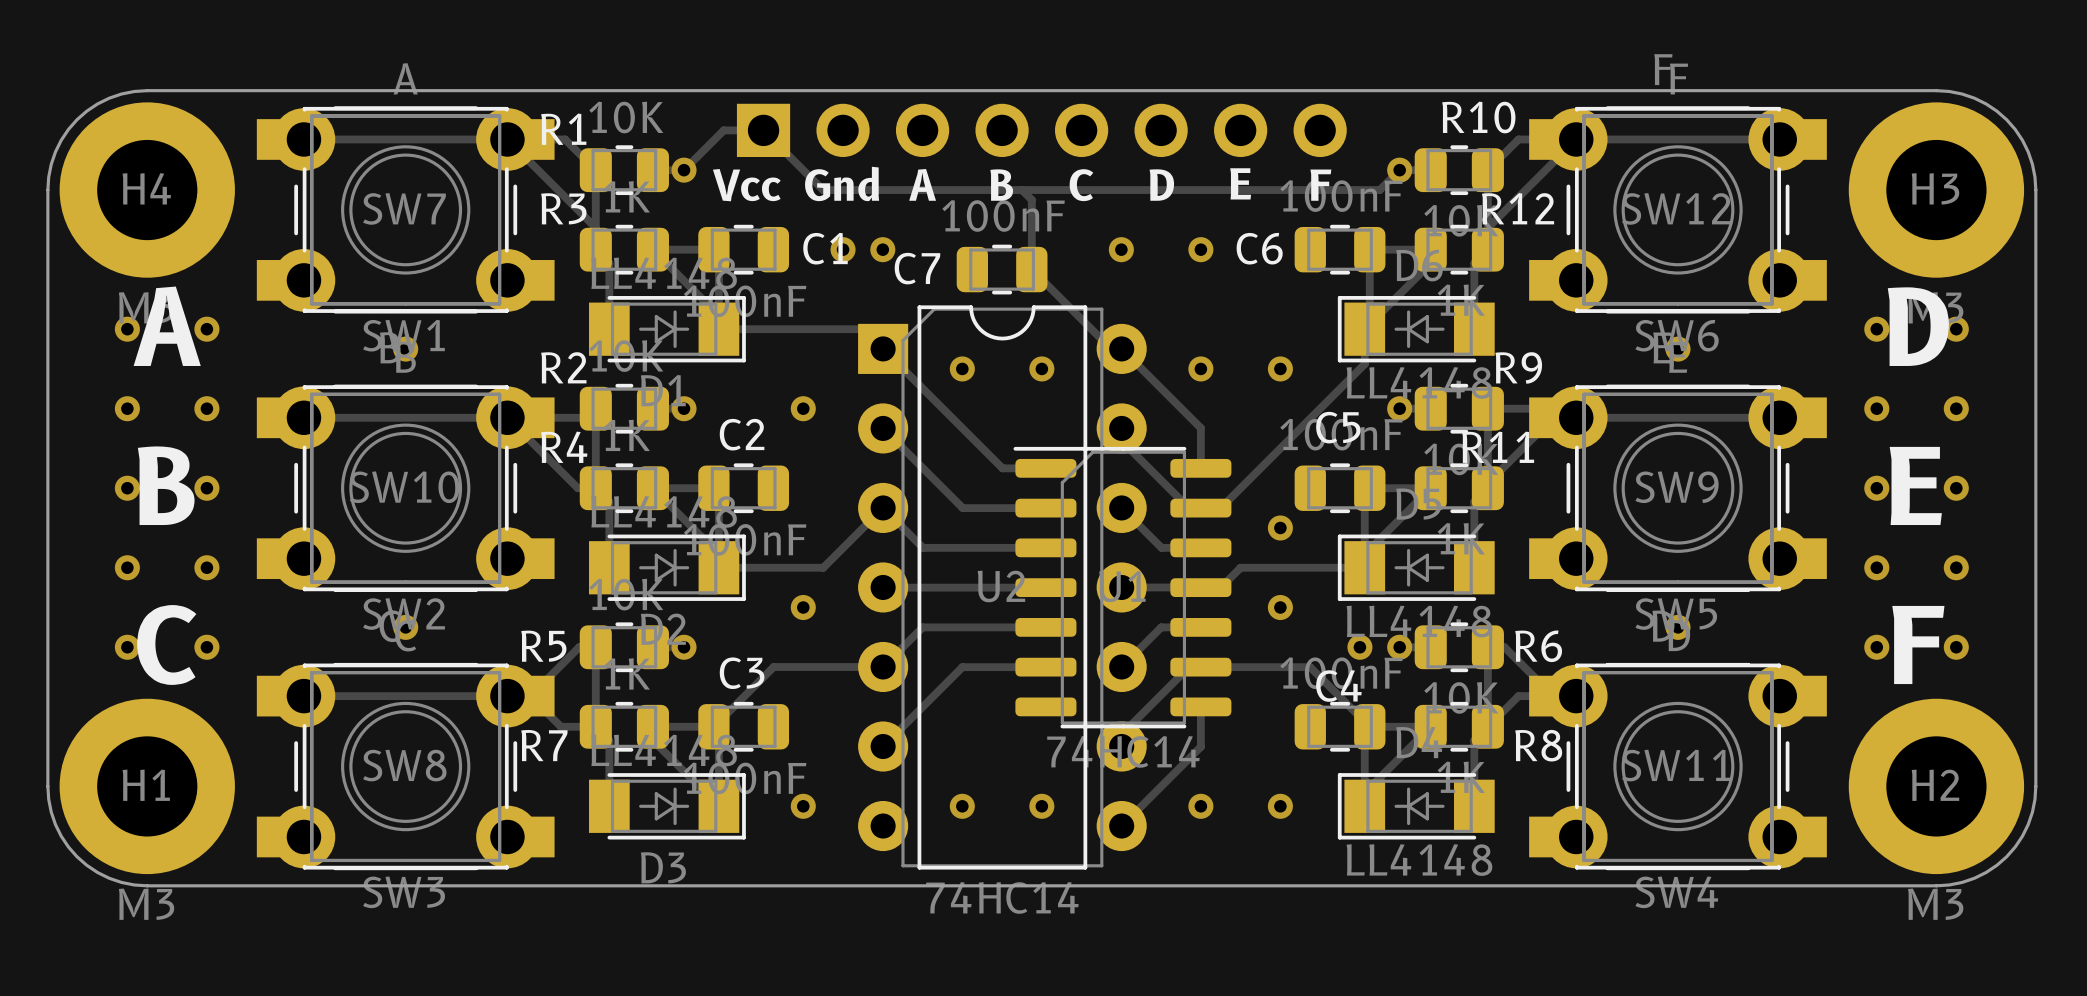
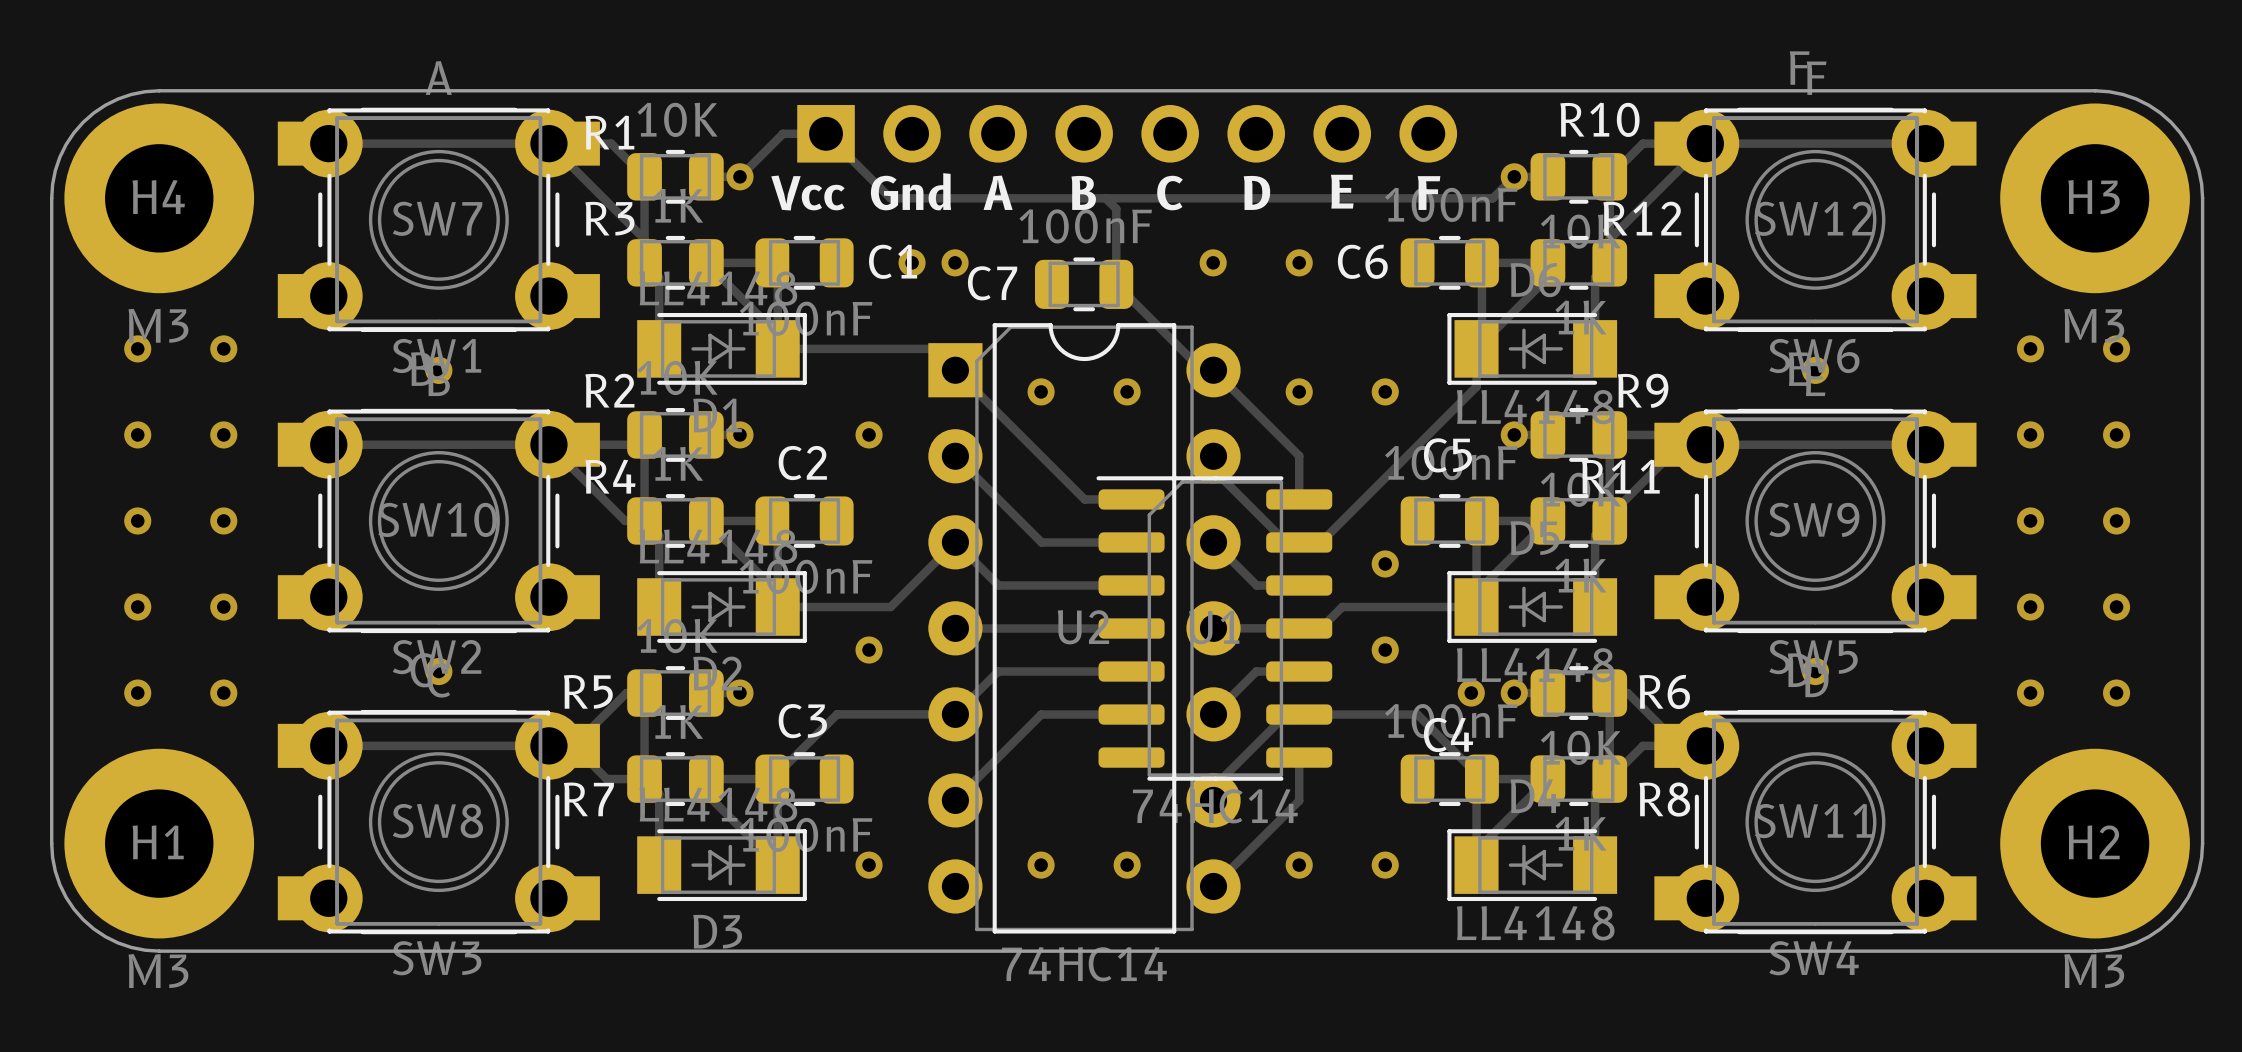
text: A (167, 326) -> none
text: D (1918, 326) -> none
text: B (166, 485) -> none
text: E (1915, 485) -> none
text: C (166, 644) -> none
text: F (1918, 644) -> none

